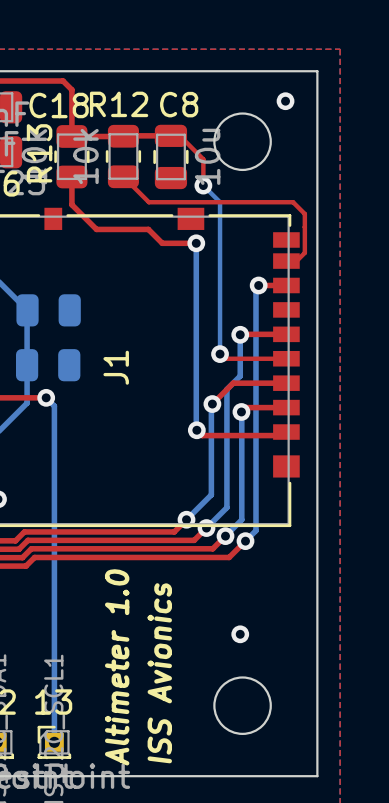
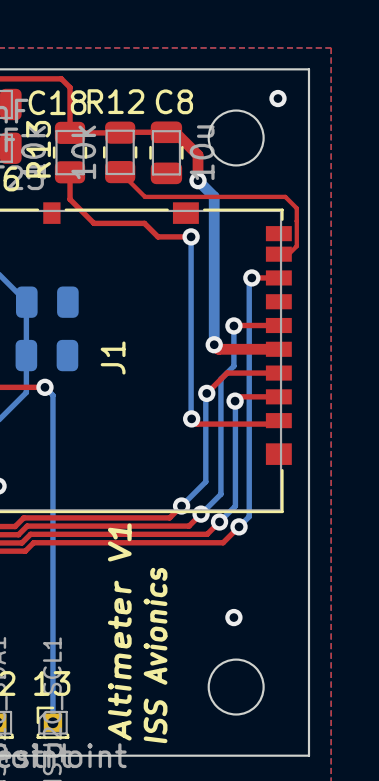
top track width: thin (180, 136) (203, 159) (203, 185) -> thick (176, 133) (198, 155) (198, 180)
bottom track width: thin (203, 185) (220, 202) (220, 354) -> thick (198, 180) (214, 196) (214, 344)
top track width: thin (220, 354) (224, 358) (286, 358) -> thick (214, 344) (218, 349) (278, 349)
text: Altimeter 1.0 (117, 667) -> Altimeter V1 (119, 631)

